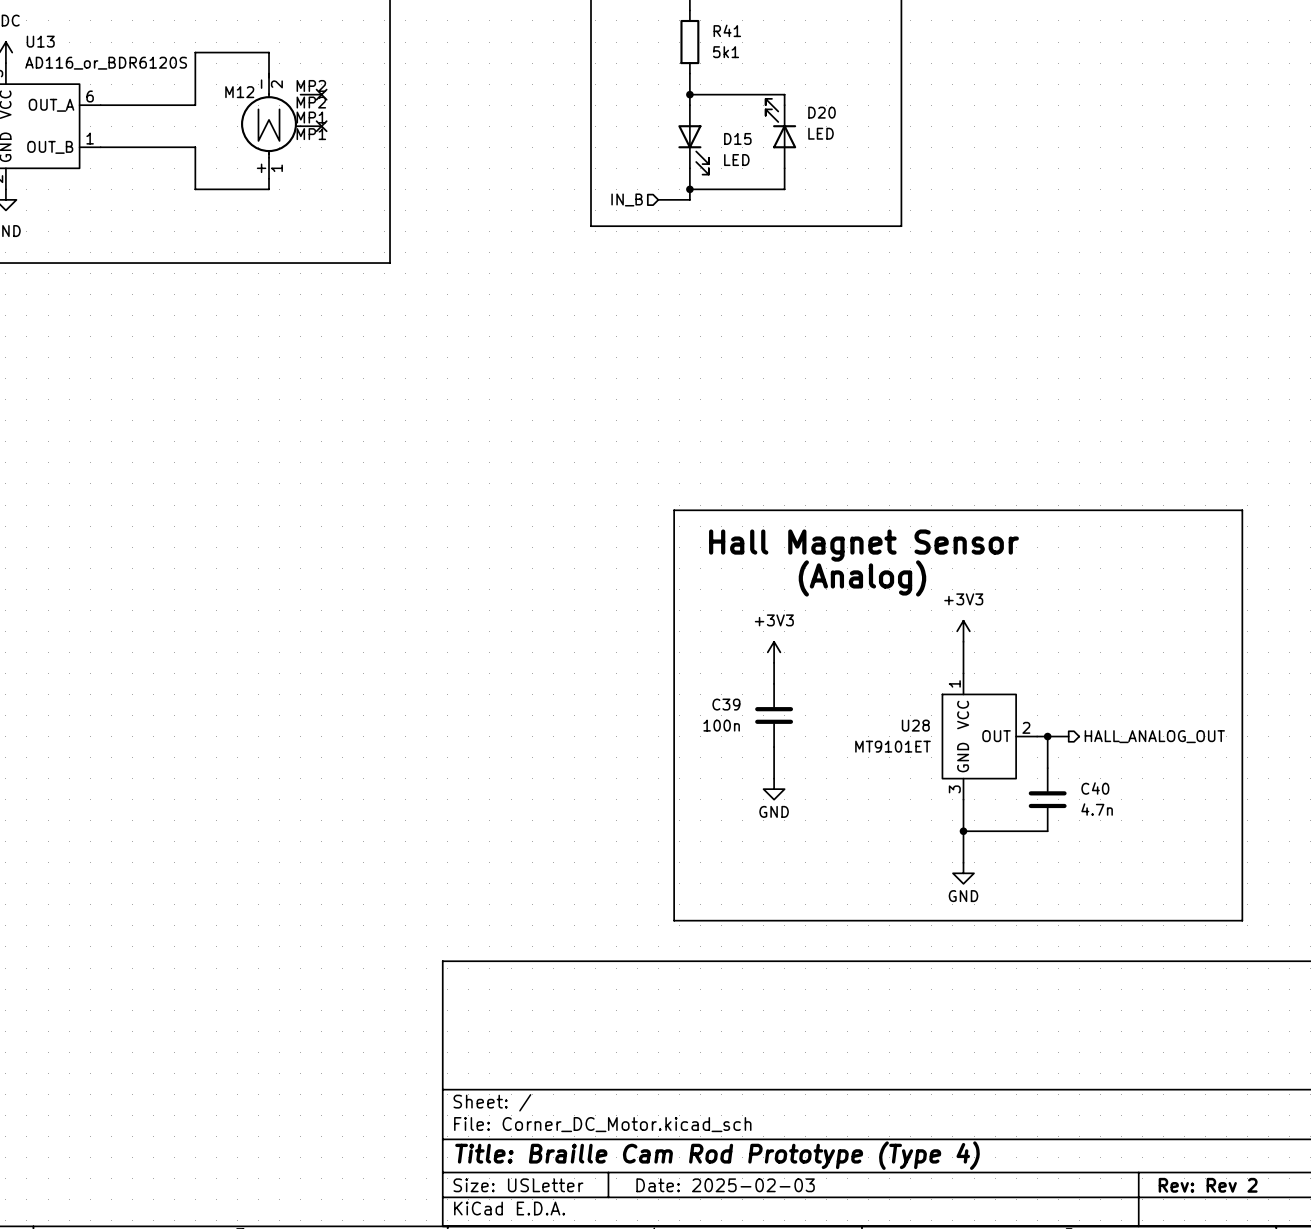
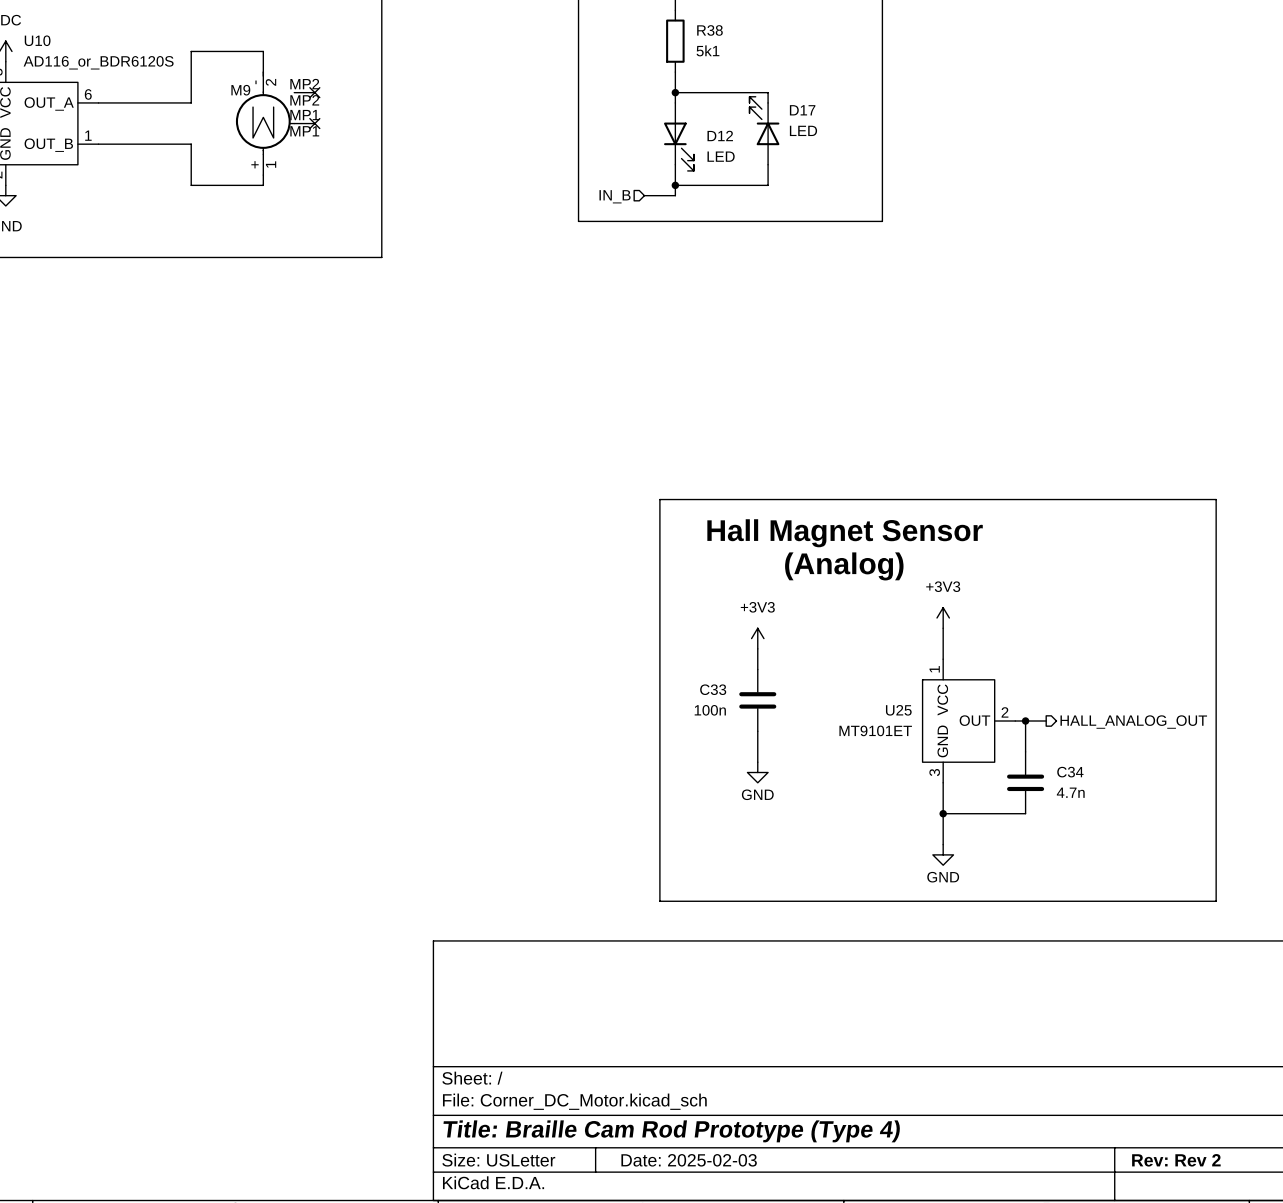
R41 name: R41 (727, 30) -> R38 (709, 30)
U13 name: U13 (40, 41) -> U10 (37, 40)
M12 name: M12 (239, 92) -> M9 (240, 90)
D20 name: D20 (822, 112) -> D17 (802, 110)
D15 name: D15 (737, 138) -> D12 (720, 135)
C39 name: C39 (726, 704) -> C33 (713, 689)
U28 name: U28 (915, 725) -> U25 (898, 710)
C40 name: C40 (1095, 788) -> C34 (1070, 772)

